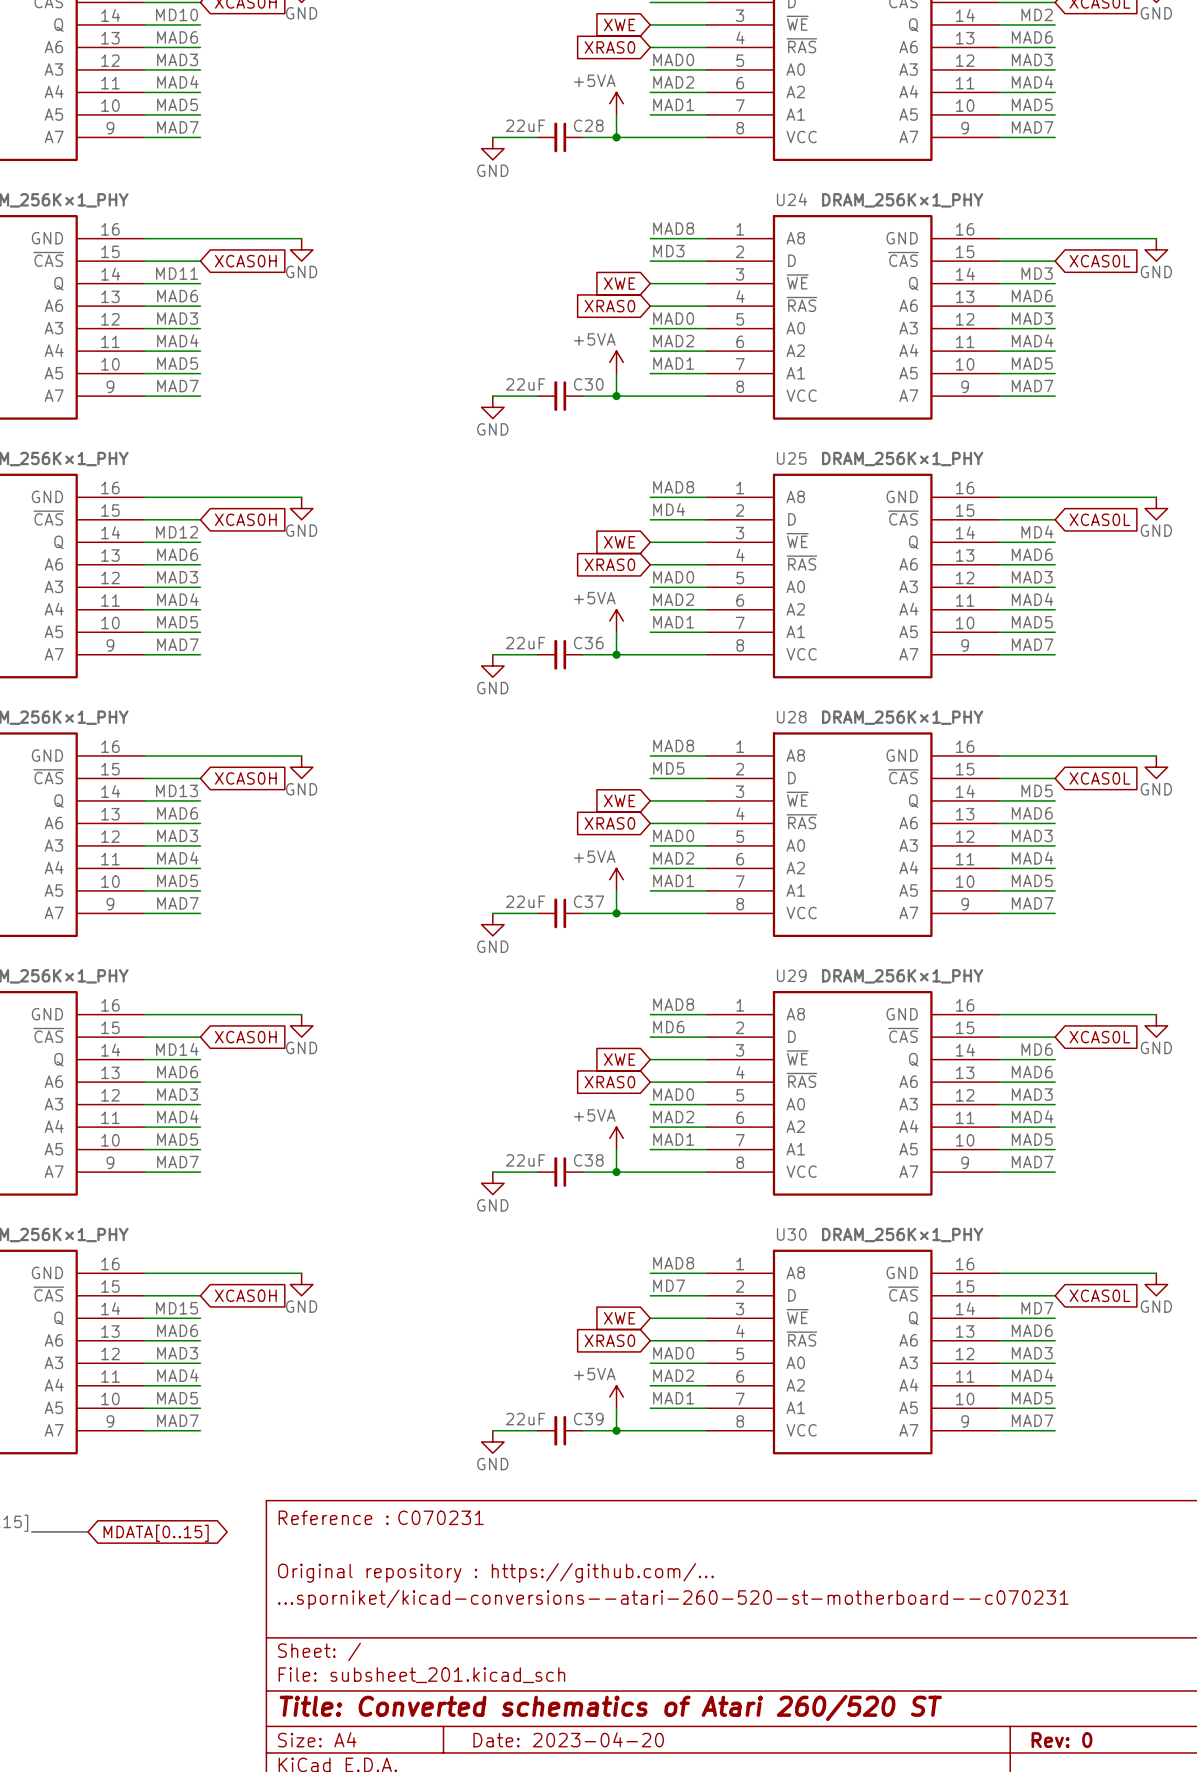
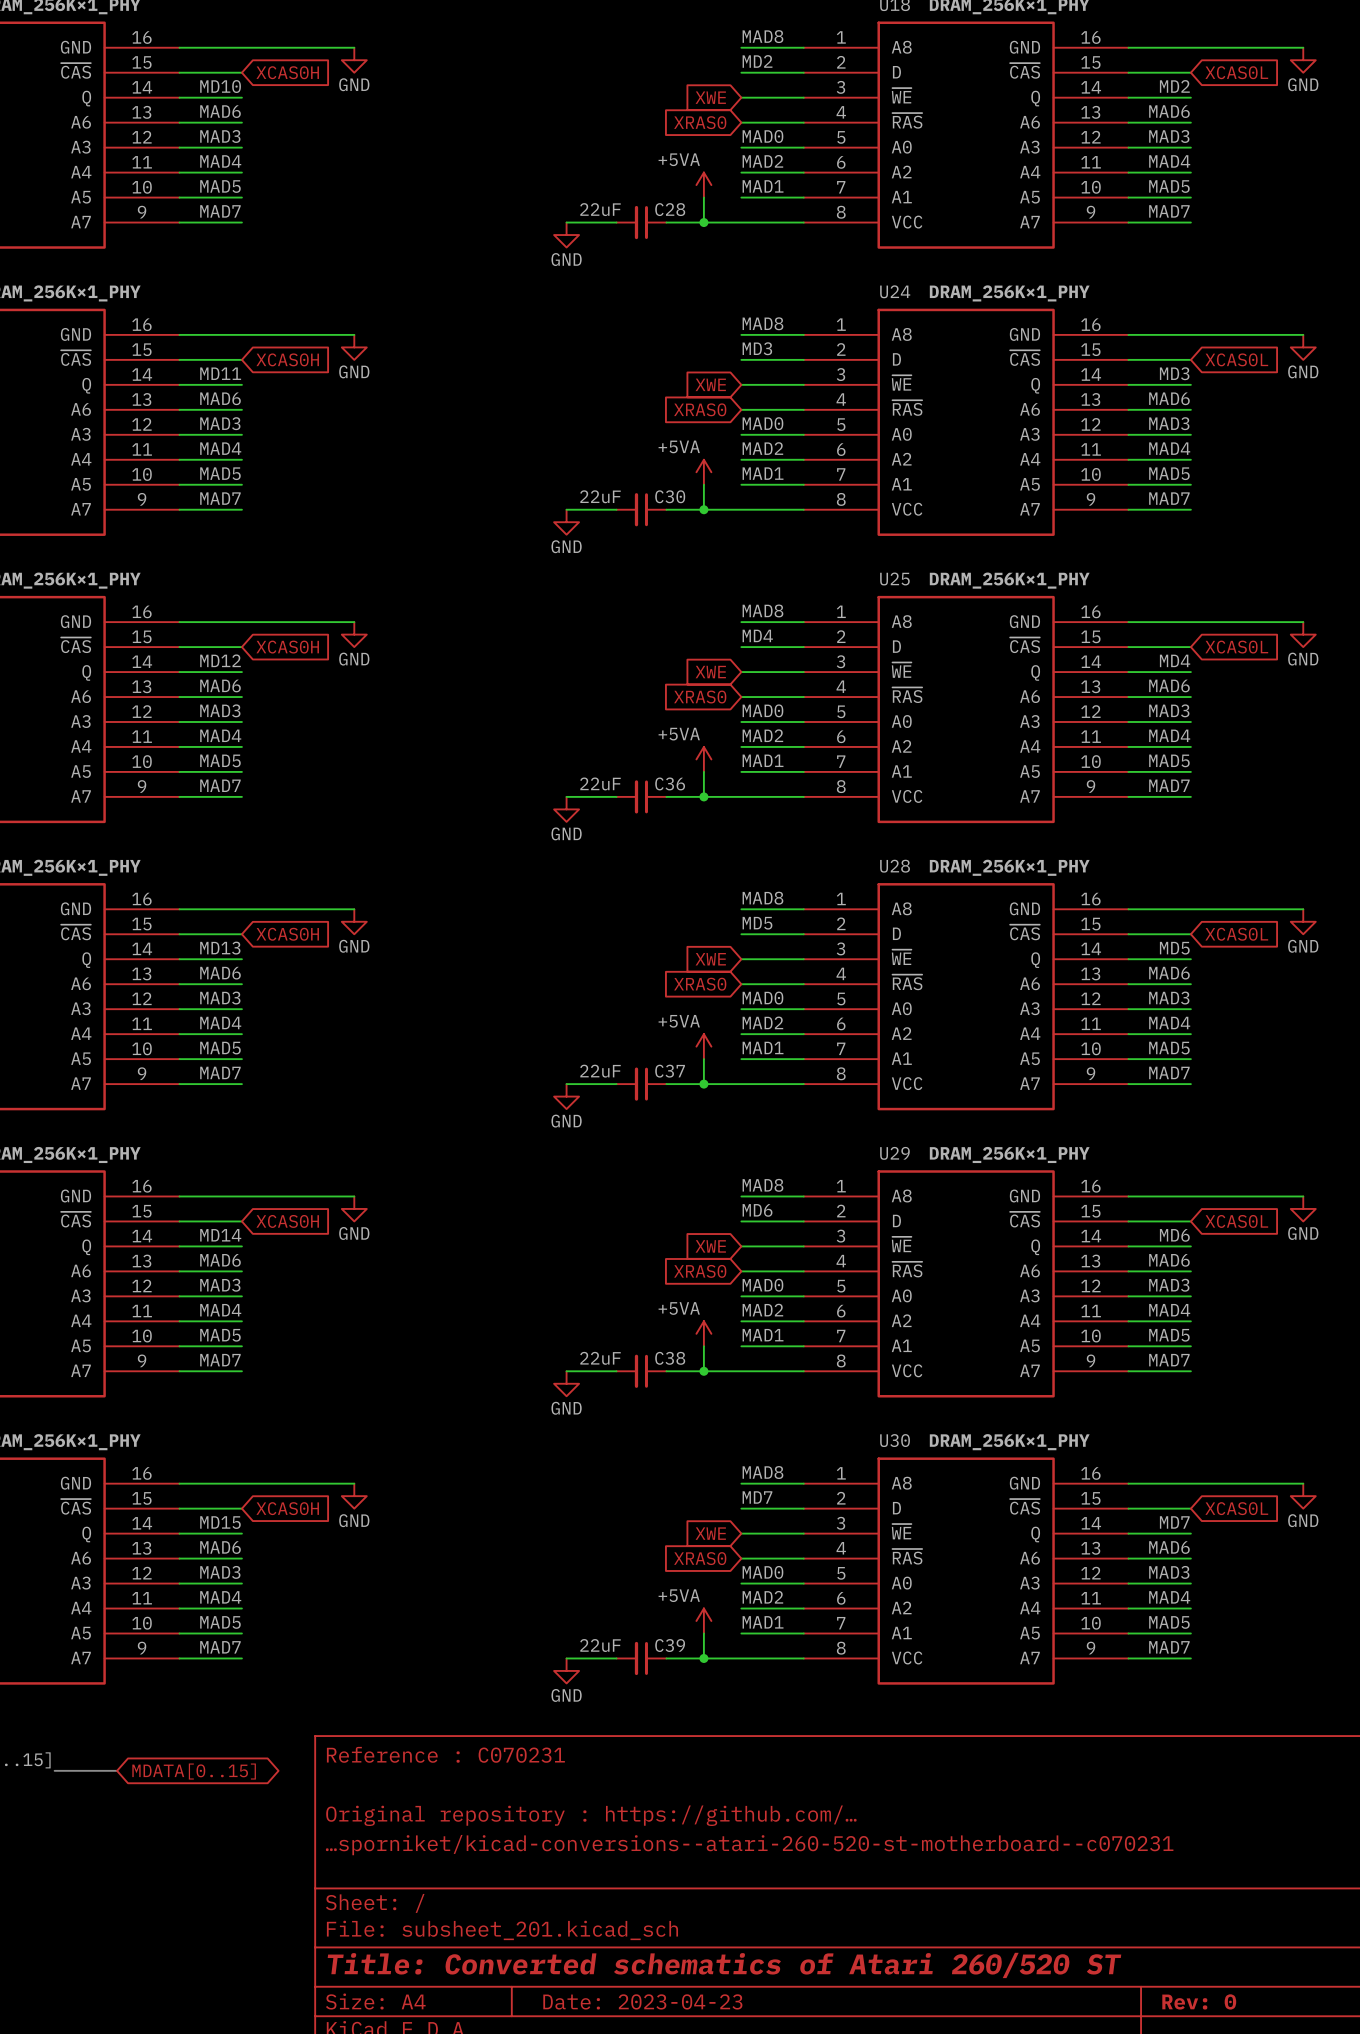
title block: Date: 2023-04-20 (568, 1739) -> Date: 2023-04-23 (642, 2001)

